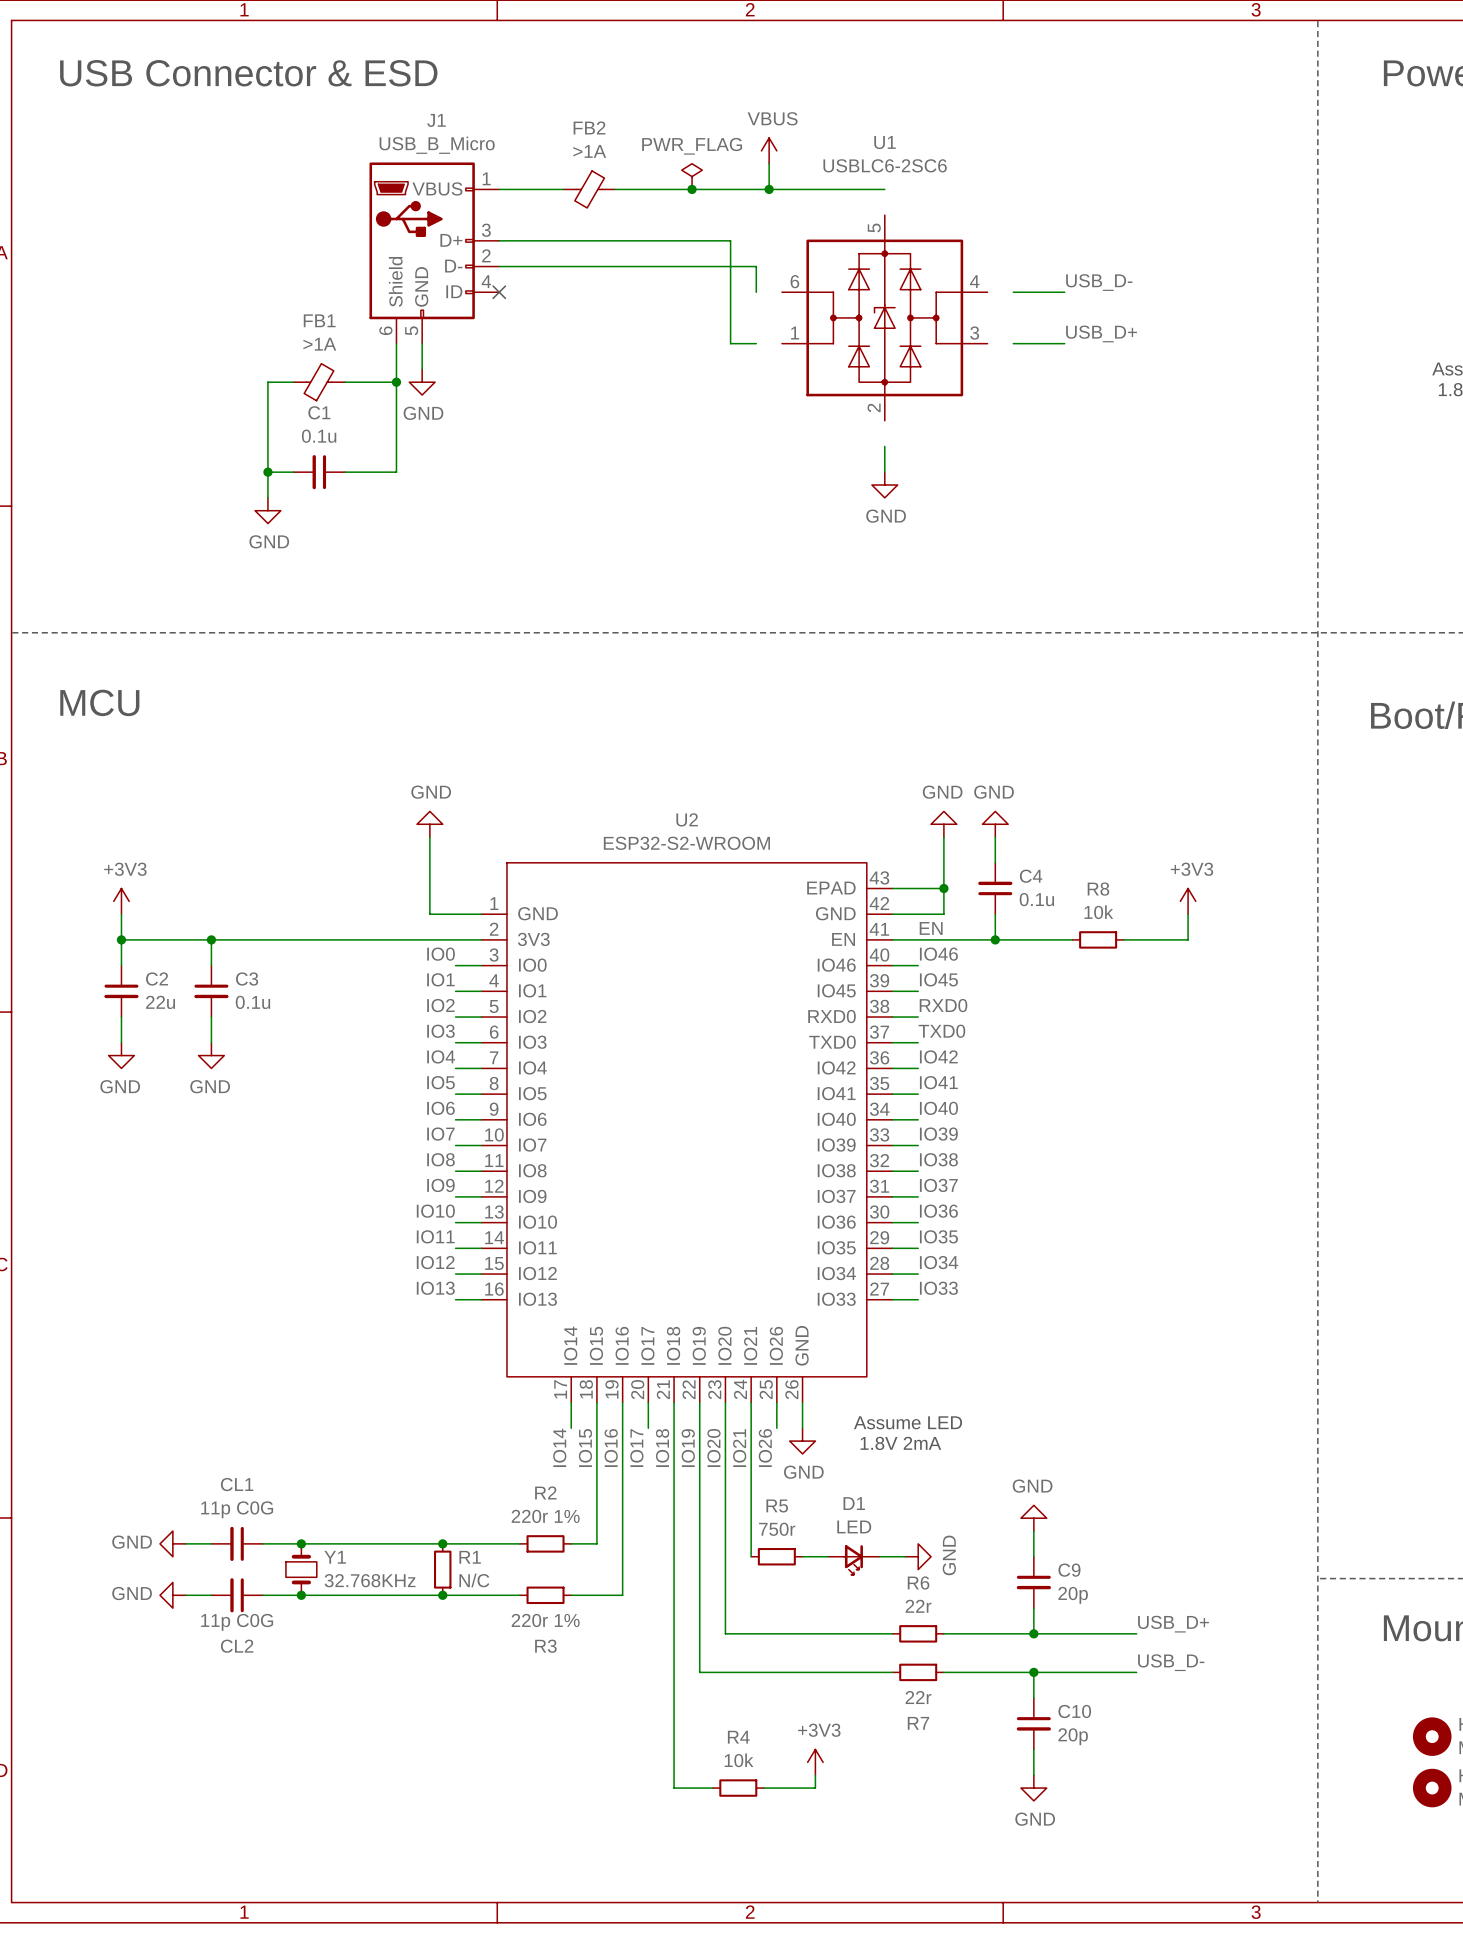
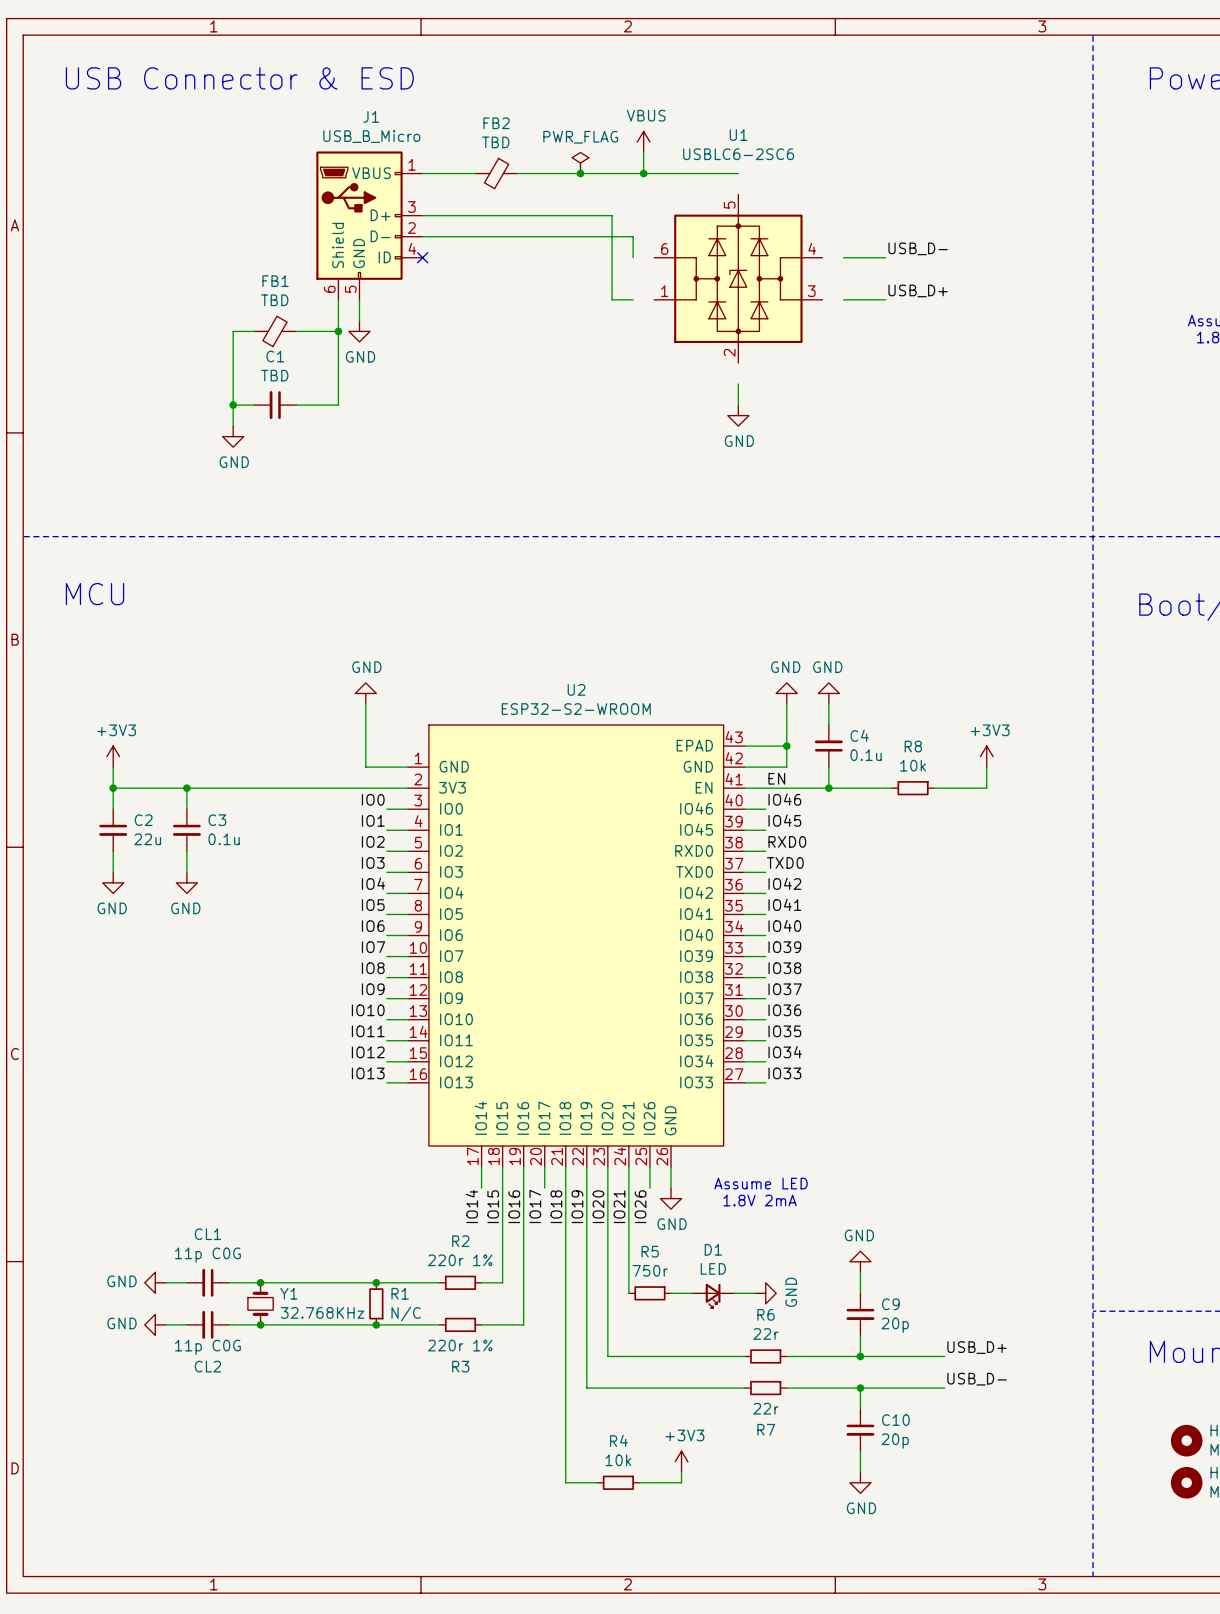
FB2 value: >1A (589, 151) -> TBD (495, 142)
FB1 value: >1A (319, 344) -> TBD (274, 300)
C1 value: 0.1u (319, 436) -> TBD (274, 375)

